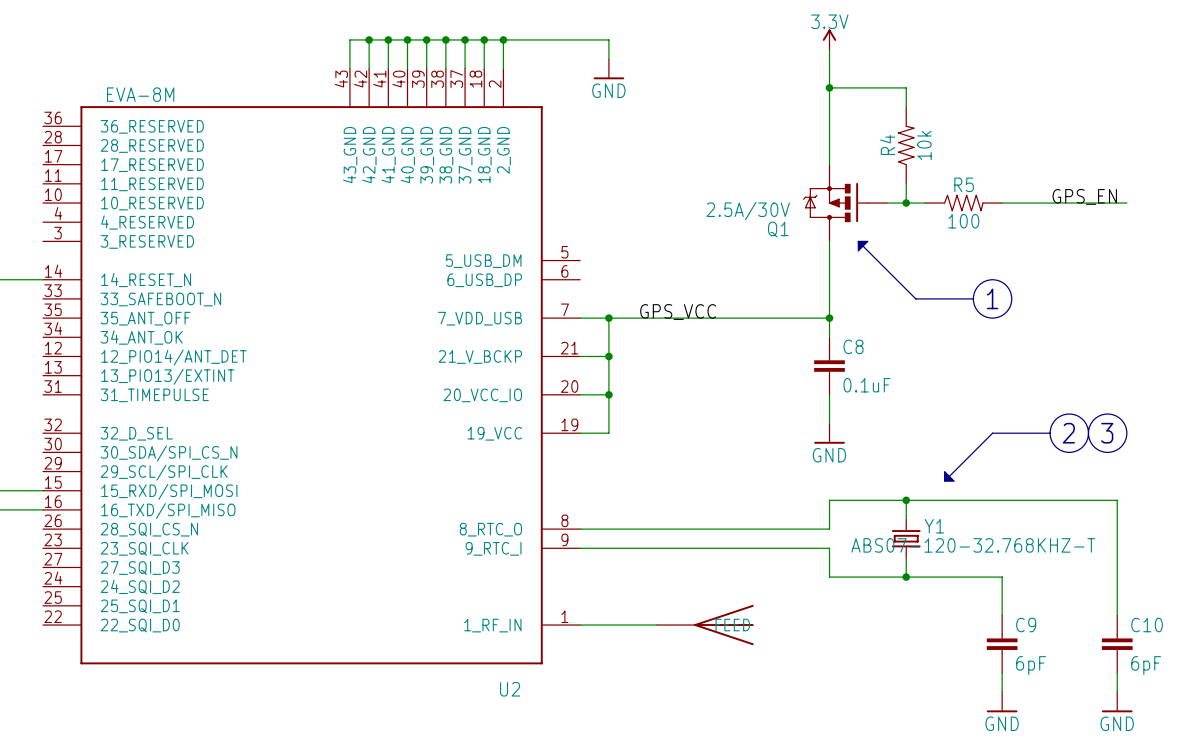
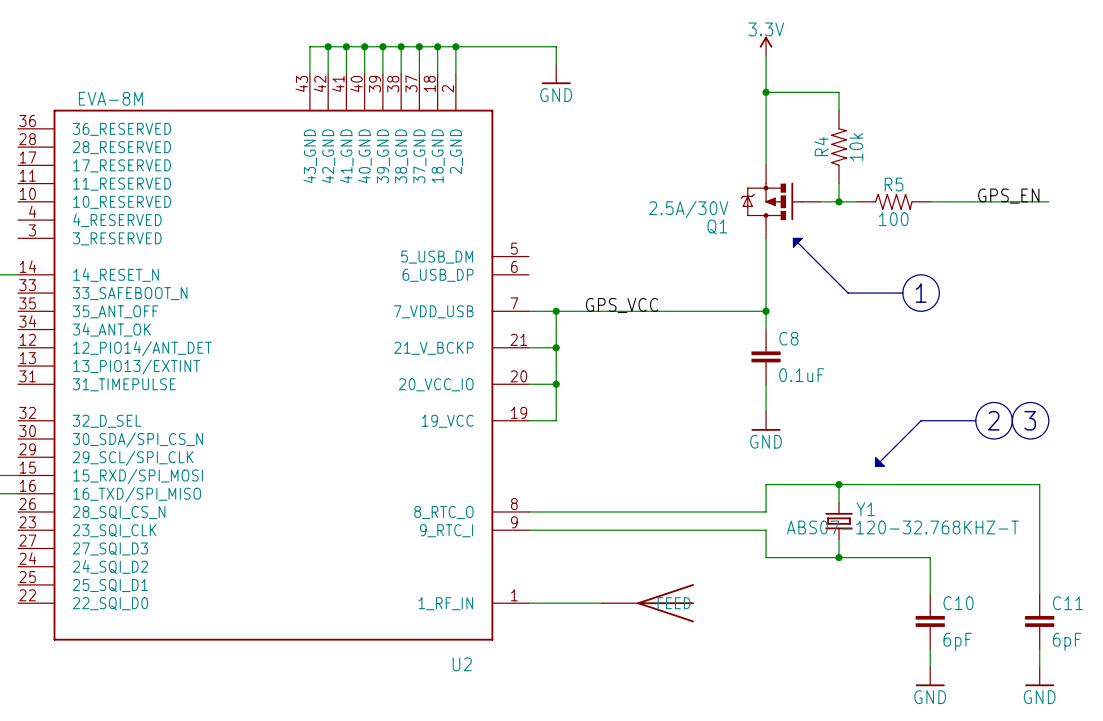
C9 name: C9 (1026, 625) -> C10 (958, 603)
C10 name: C10 (1147, 625) -> C11 (1068, 603)

